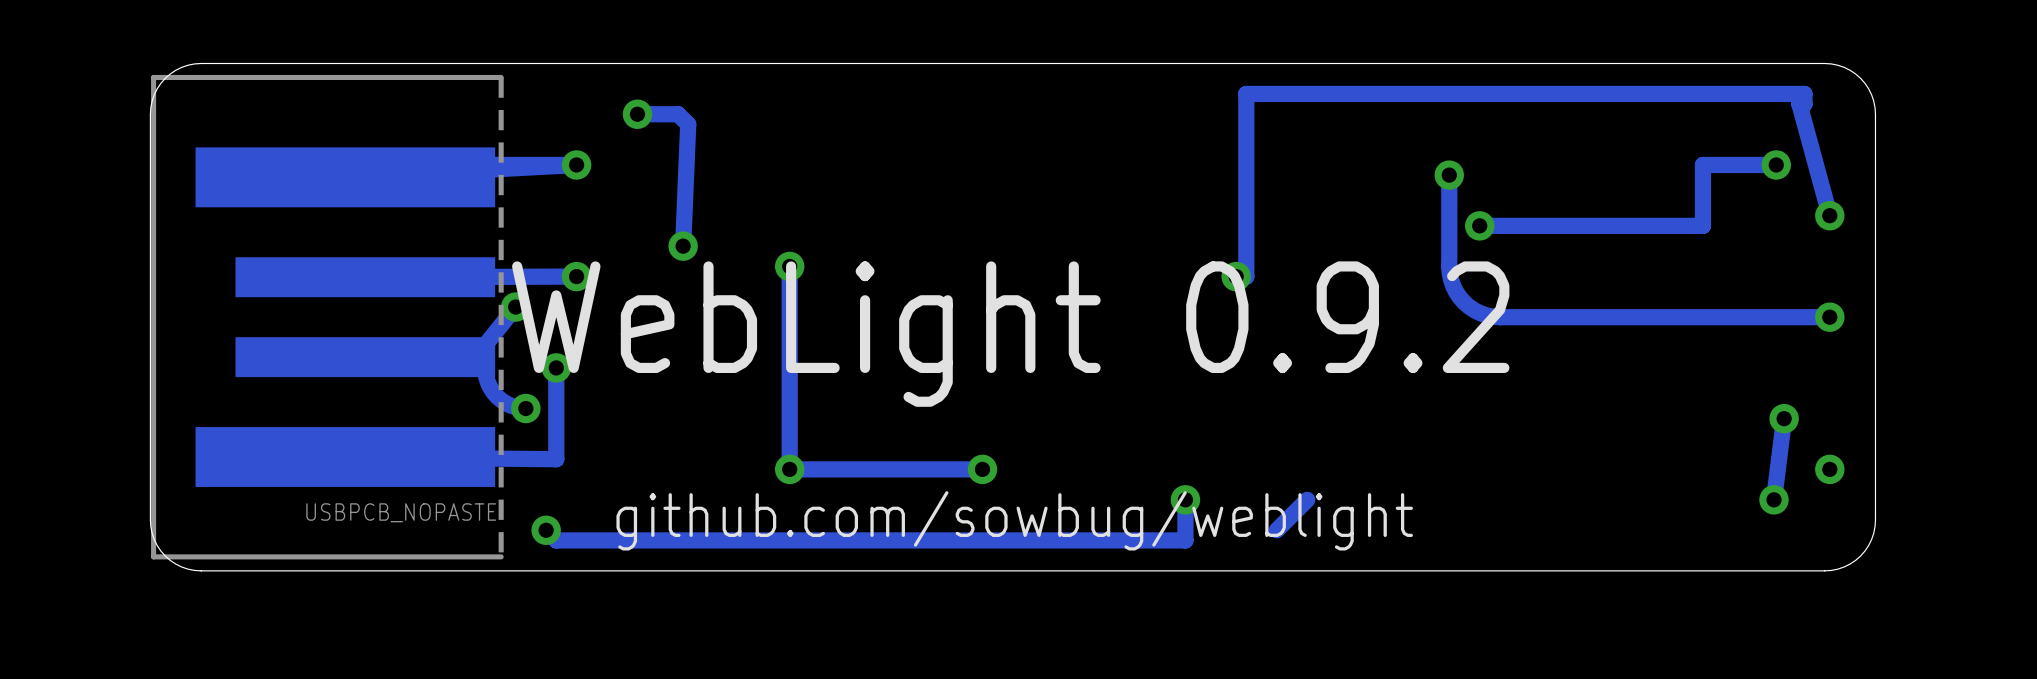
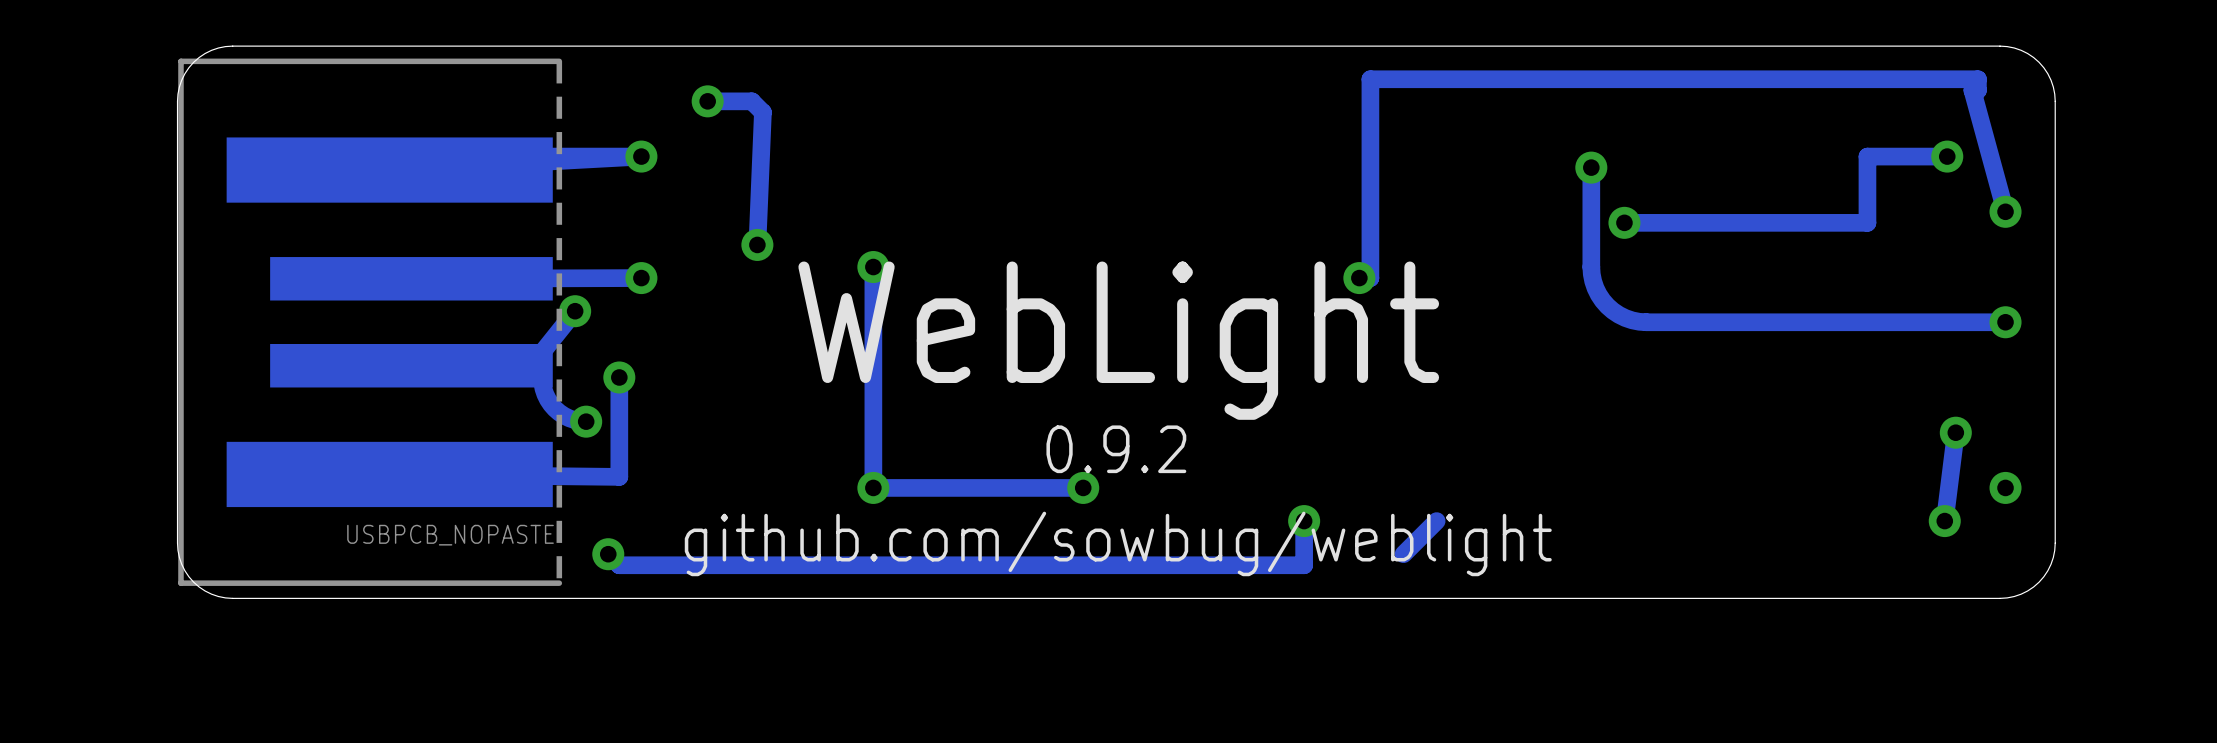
text: WebLight 0.9.2 (1010, 334) -> WebLight (1118, 340)
text: none -> 0.9.2 (1116, 449)

